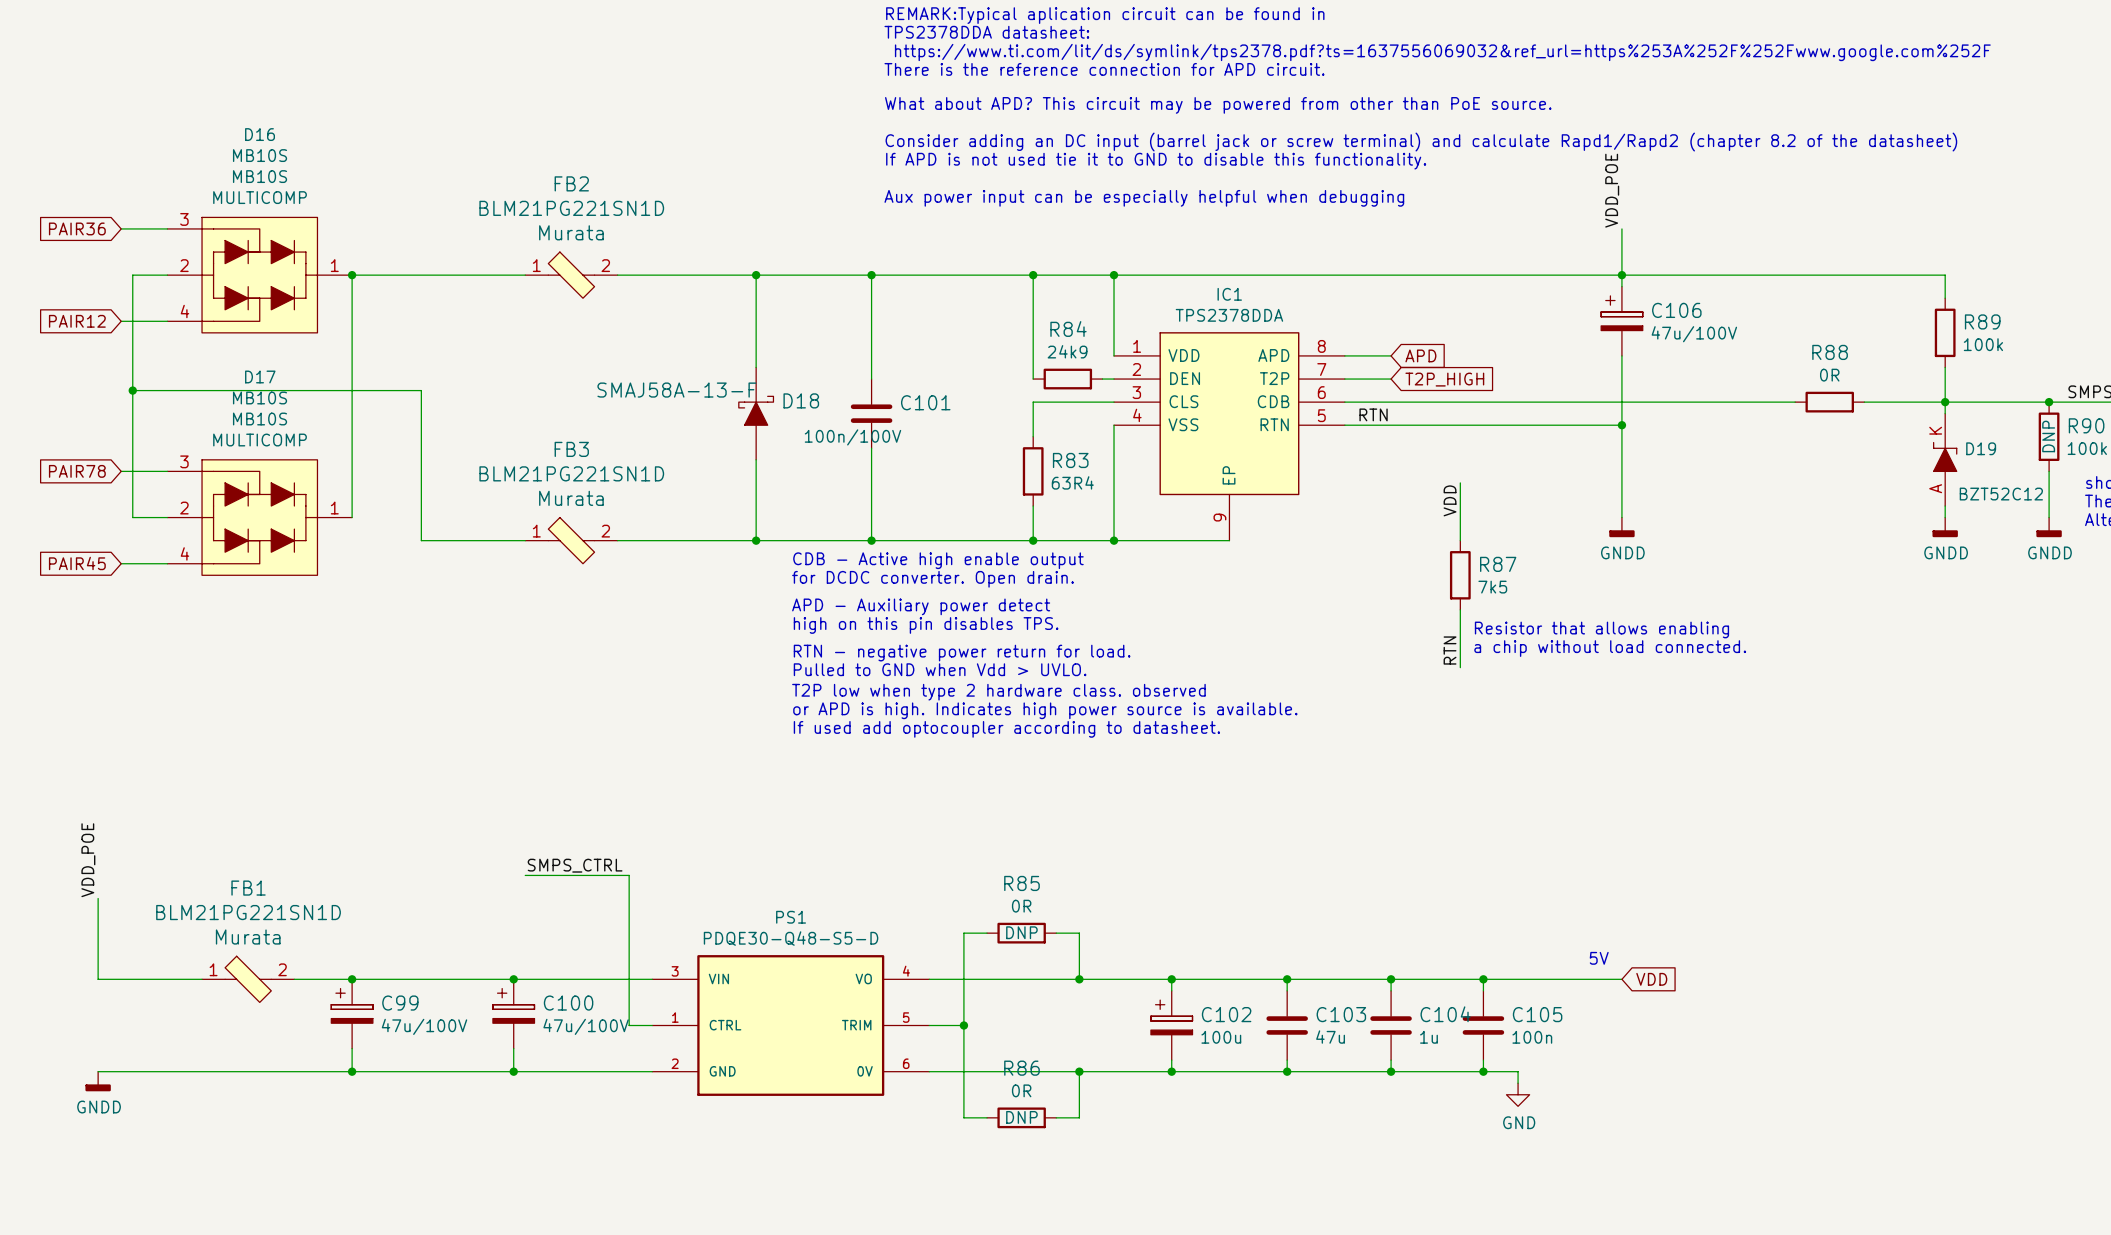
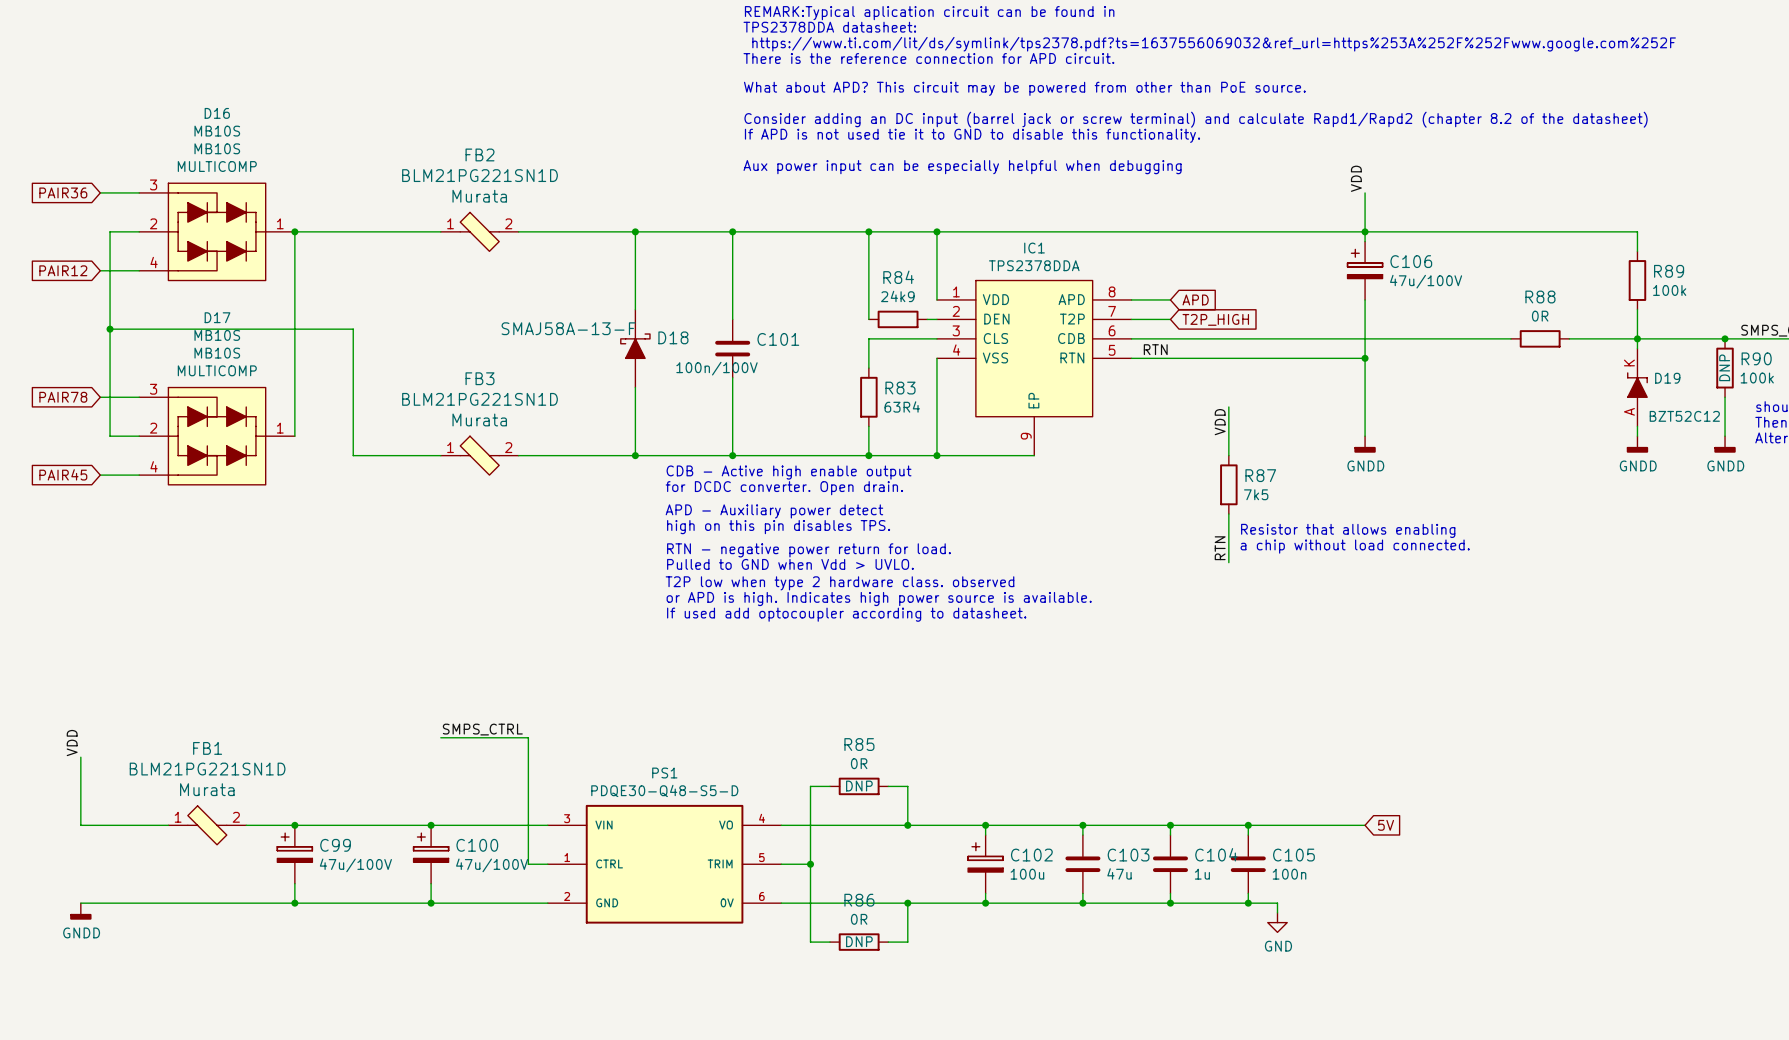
label: VDD_POE (1612, 190) -> VDD (1356, 178)
label: VDD_POE (88, 860) -> VDD (72, 743)
text: 5V (1599, 958) -> none
global label: VDD (1651, 979) -> 5V (1386, 825)

